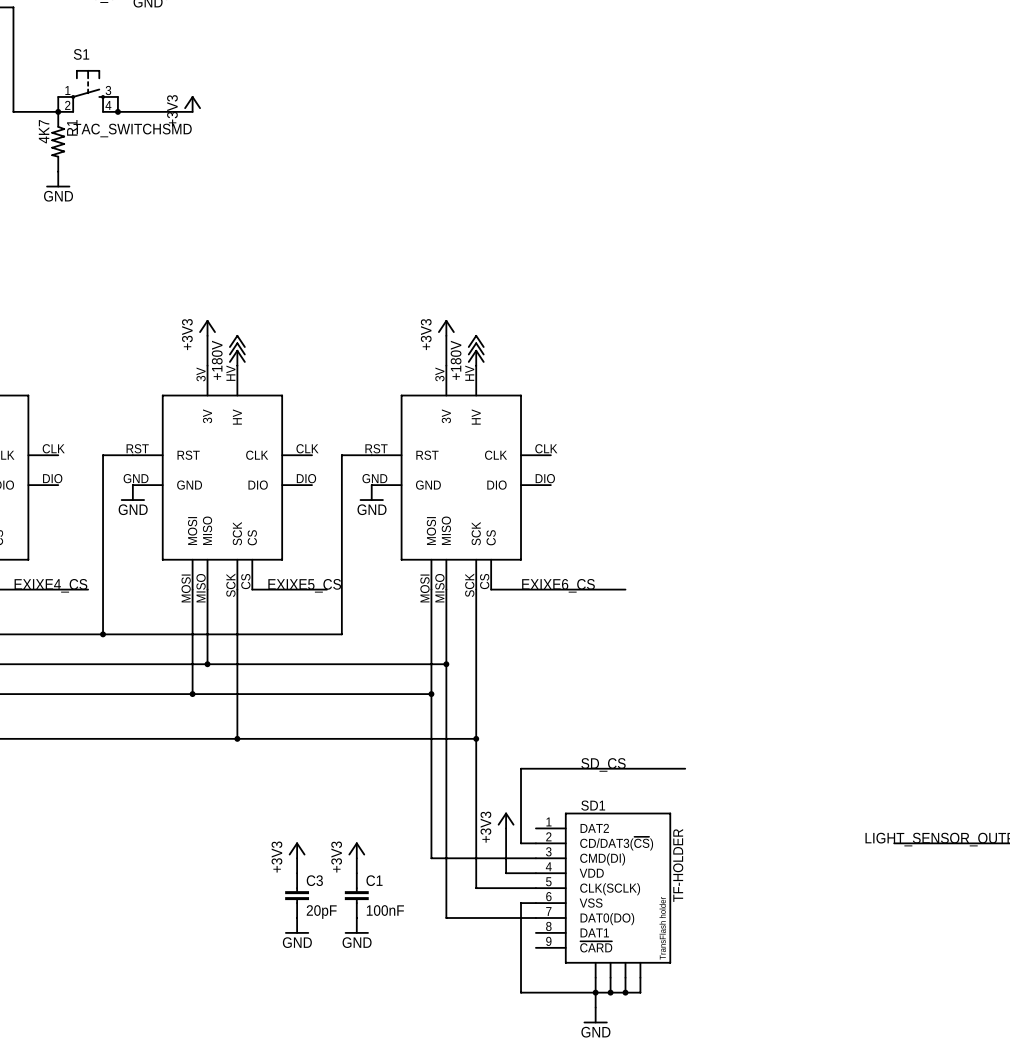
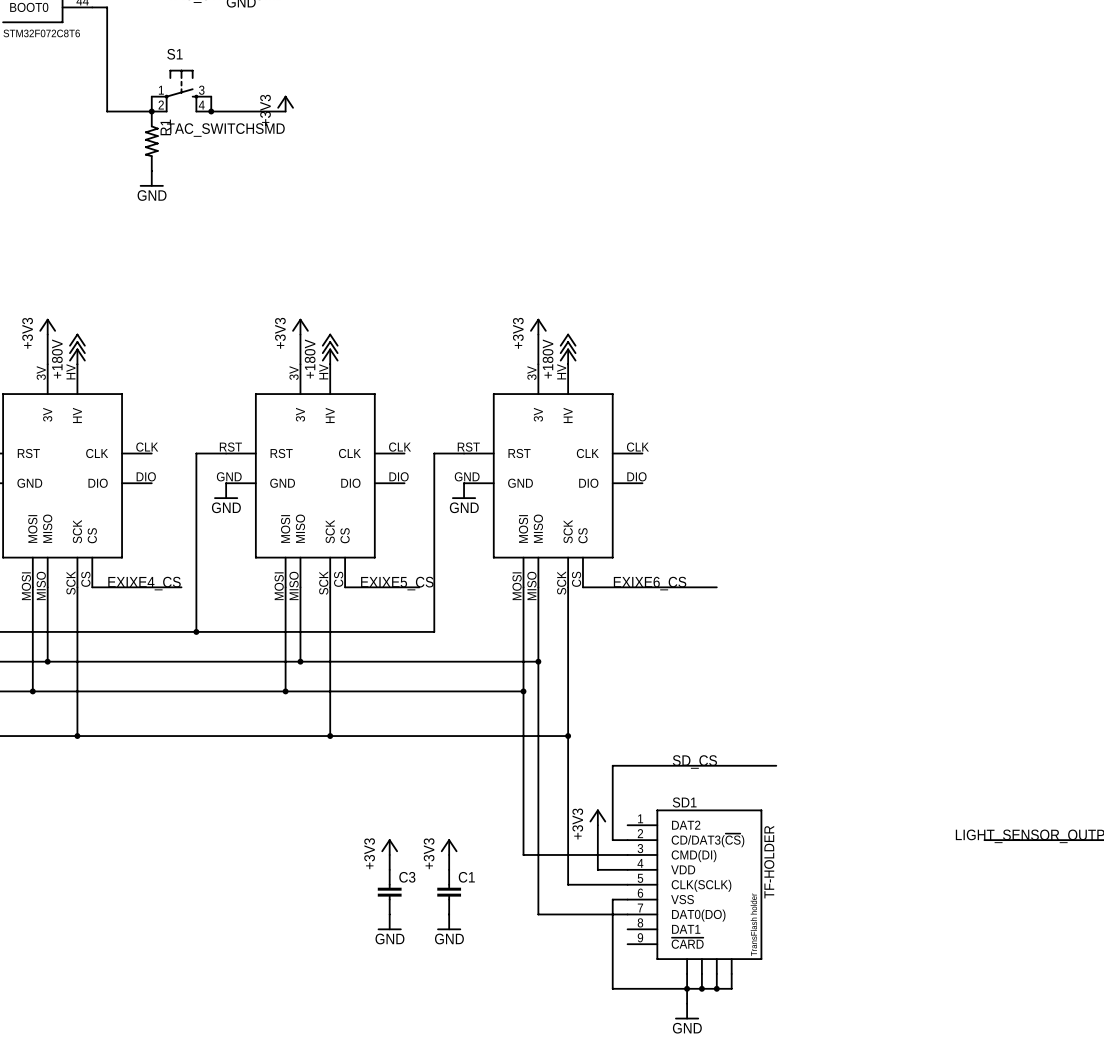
R1 value: 4K7 (44, 131) -> none
C1 value: 100nF (385, 910) -> none
C3 value: 20pF (321, 912) -> none

